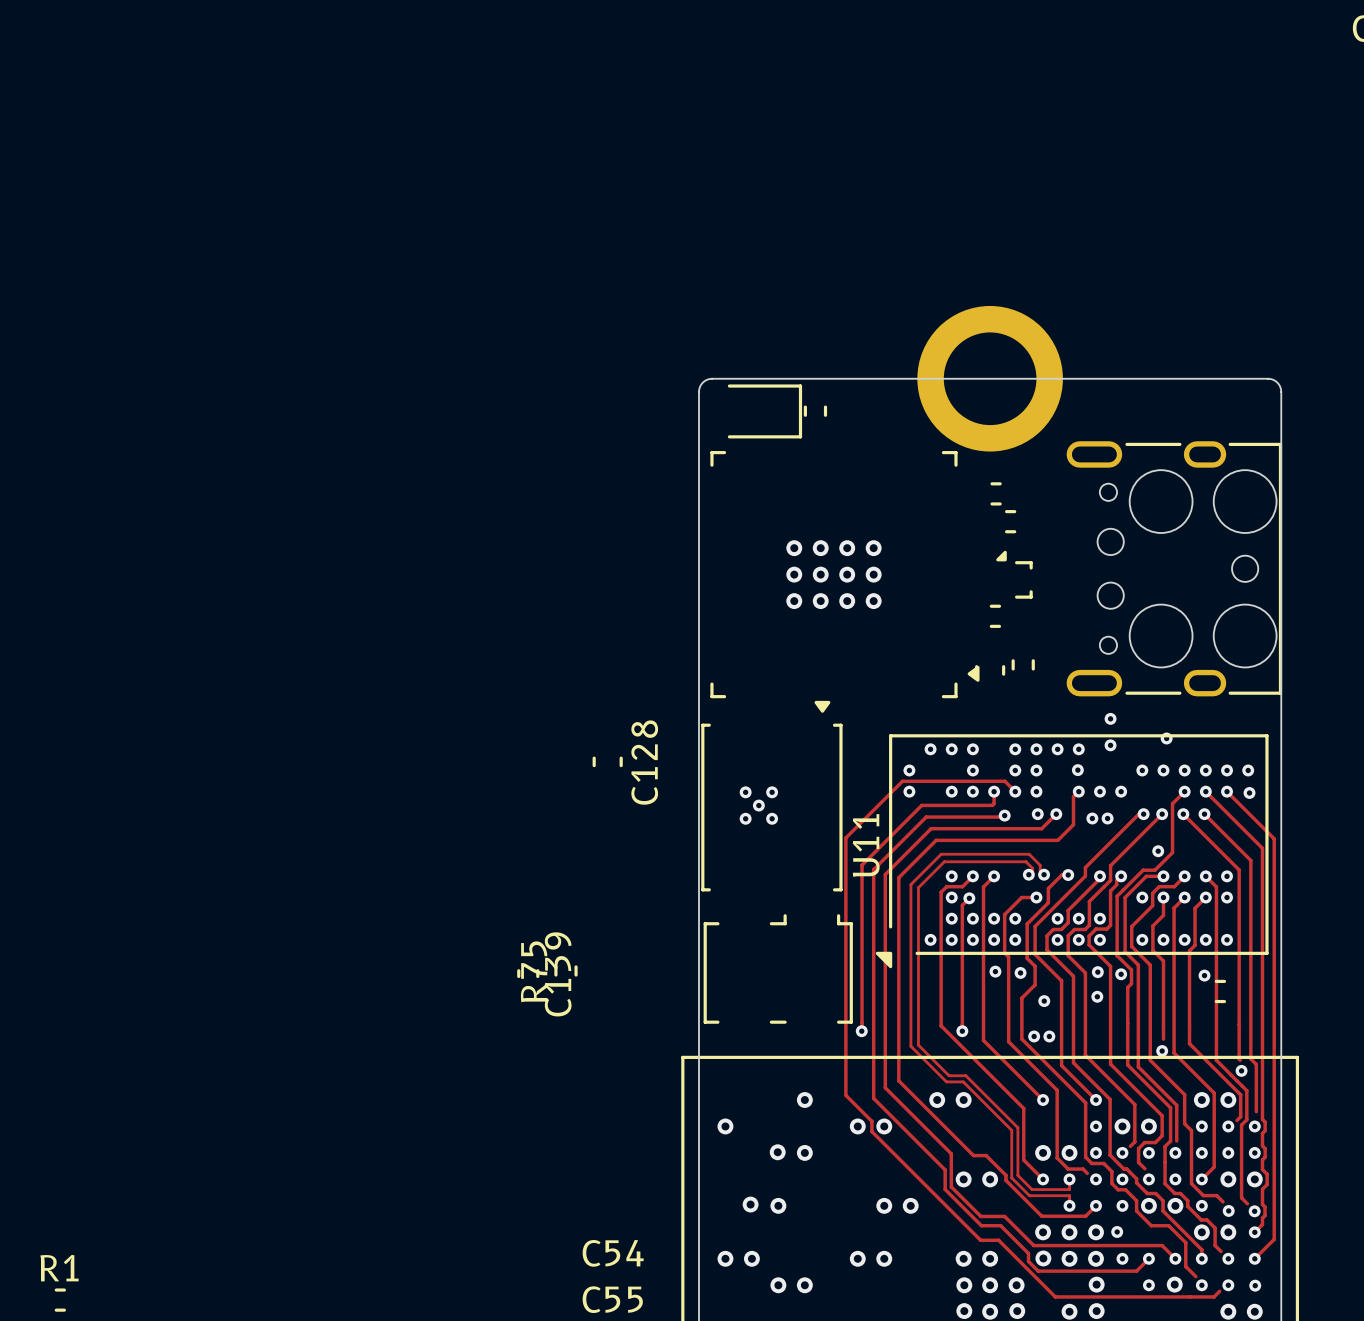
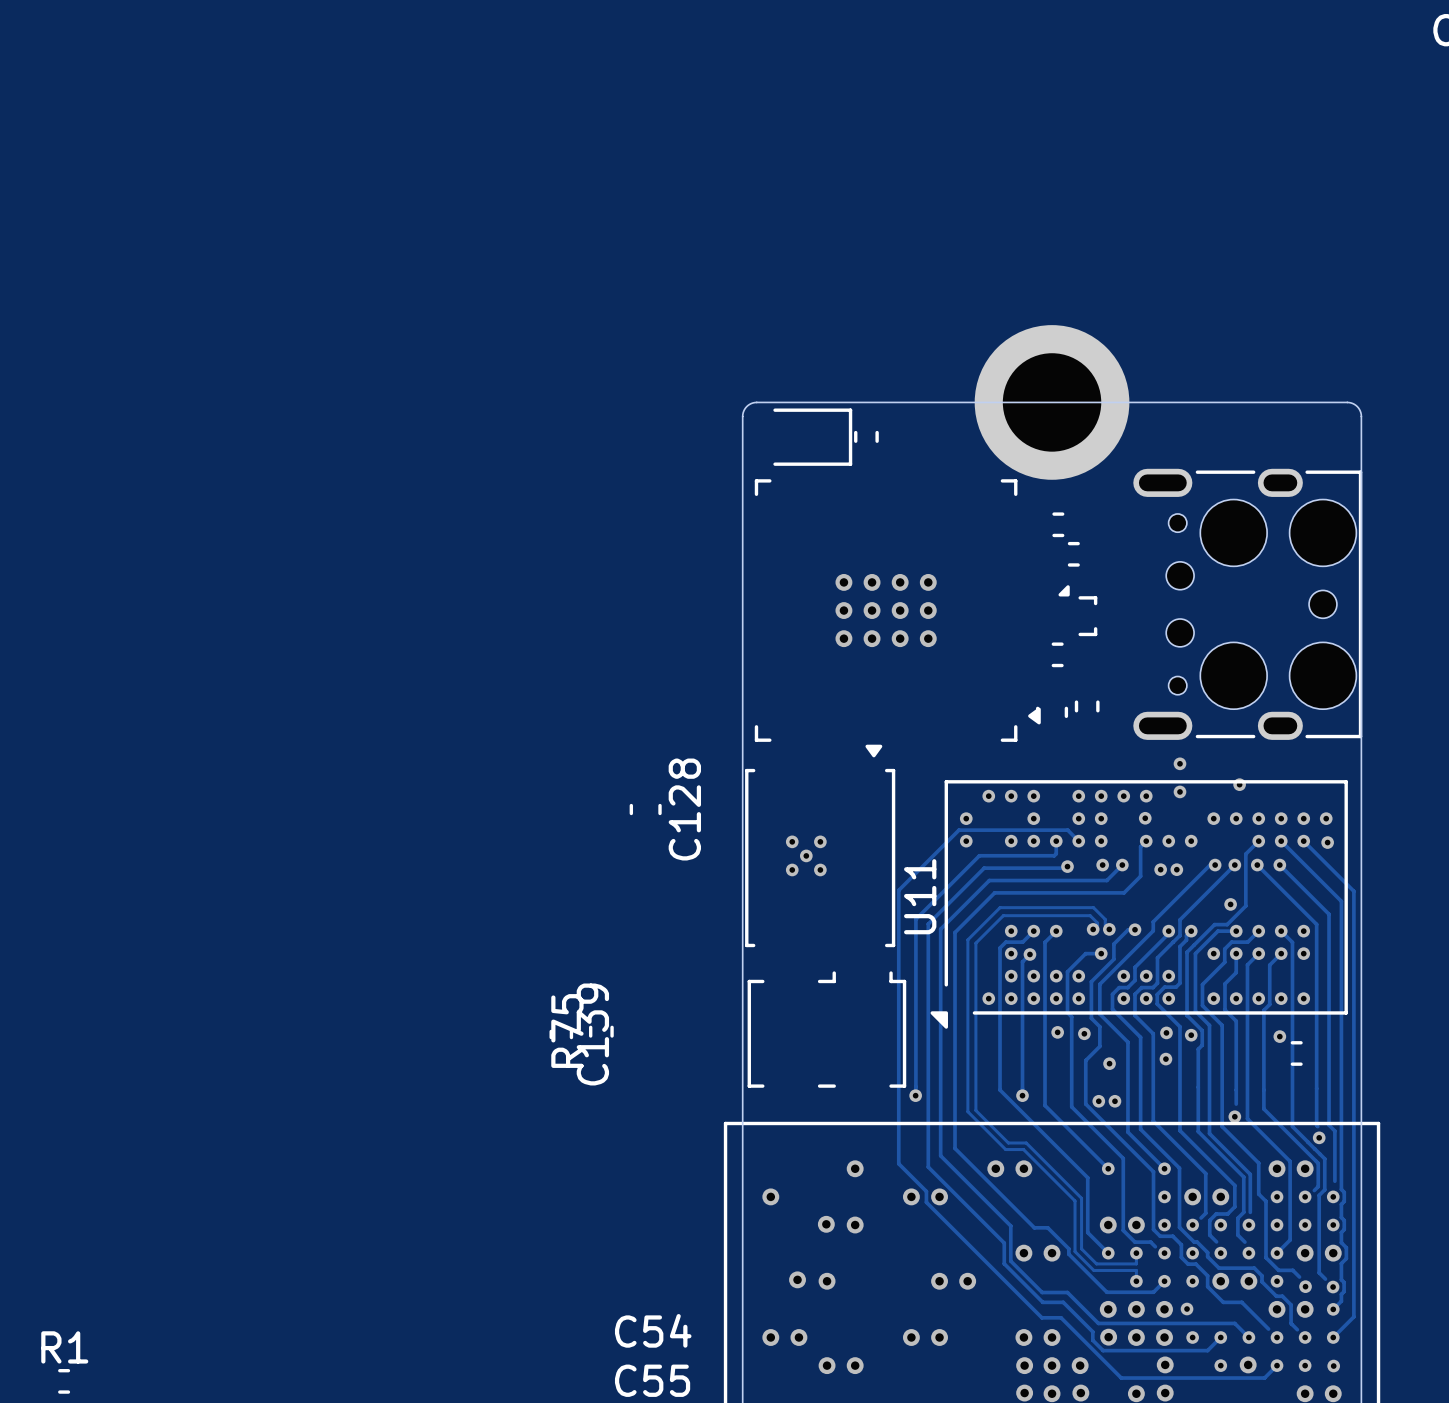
track: (1165, 1162) (1165, 1183) (1174, 1193) -> (1237, 1235) (1244, 1242)
track: (1155, 1193) (1163, 1200) (1163, 1210) (1201, 1249) (1201, 1258) -> (1228, 1268) (1248, 1268)
track: (1185, 1242) (1185, 1266) (1195, 1276) -> (1259, 1320) (1268, 1329)
track: (1219, 1291) (1214, 1296) (1190, 1296) -> (1277, 1365) (1264, 1378)

